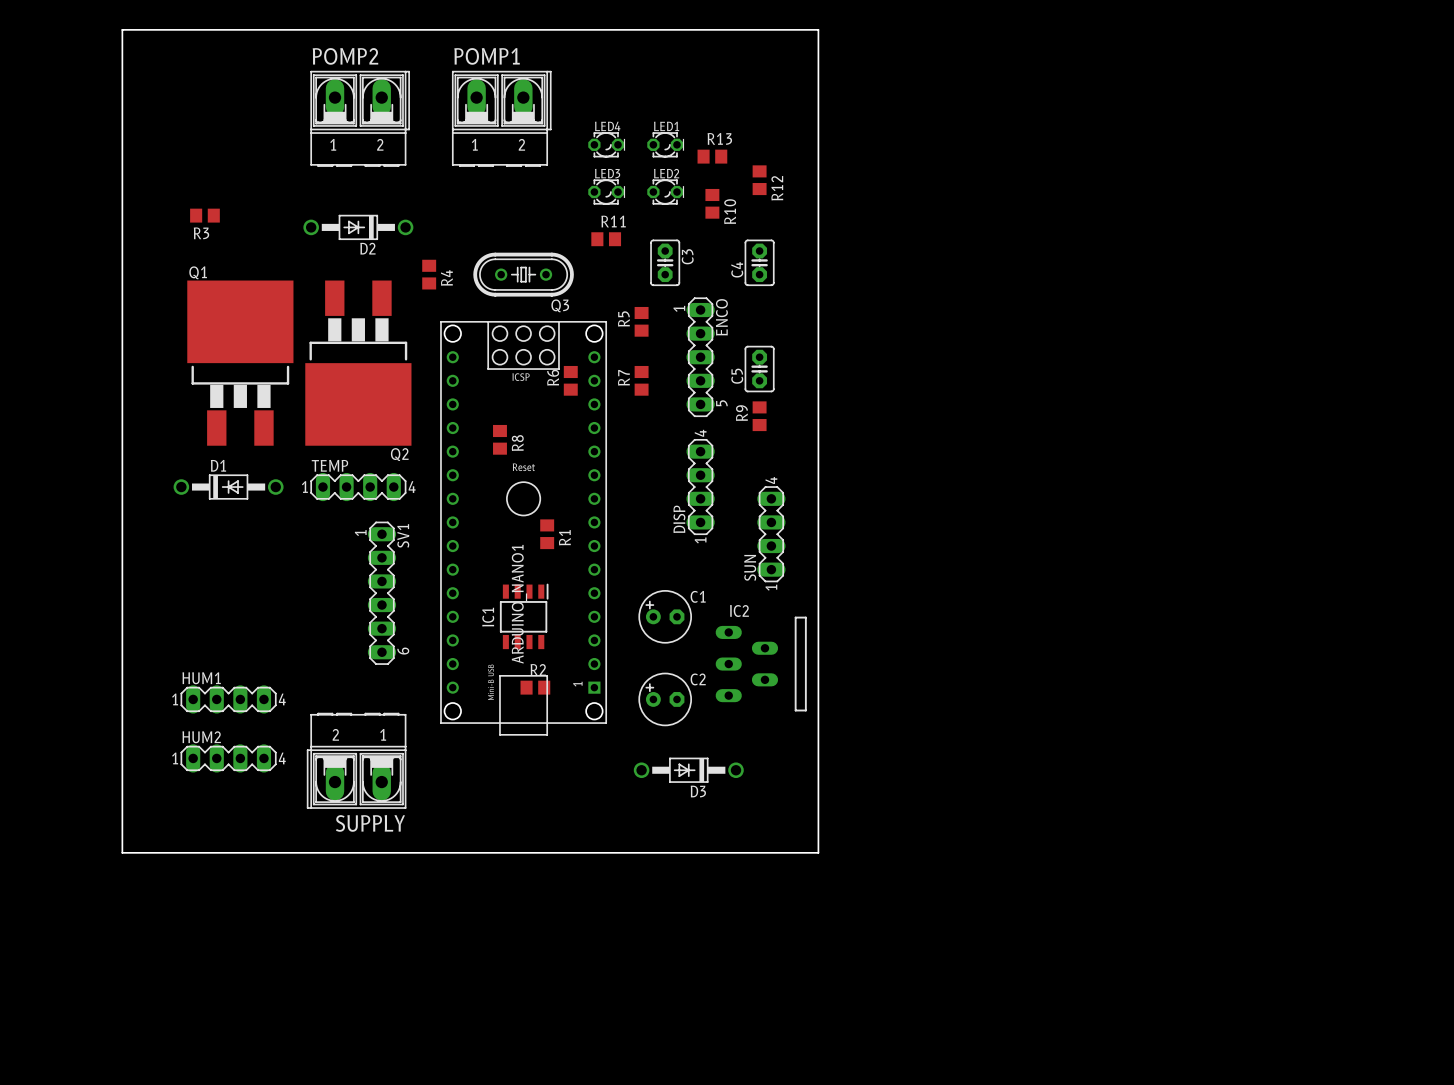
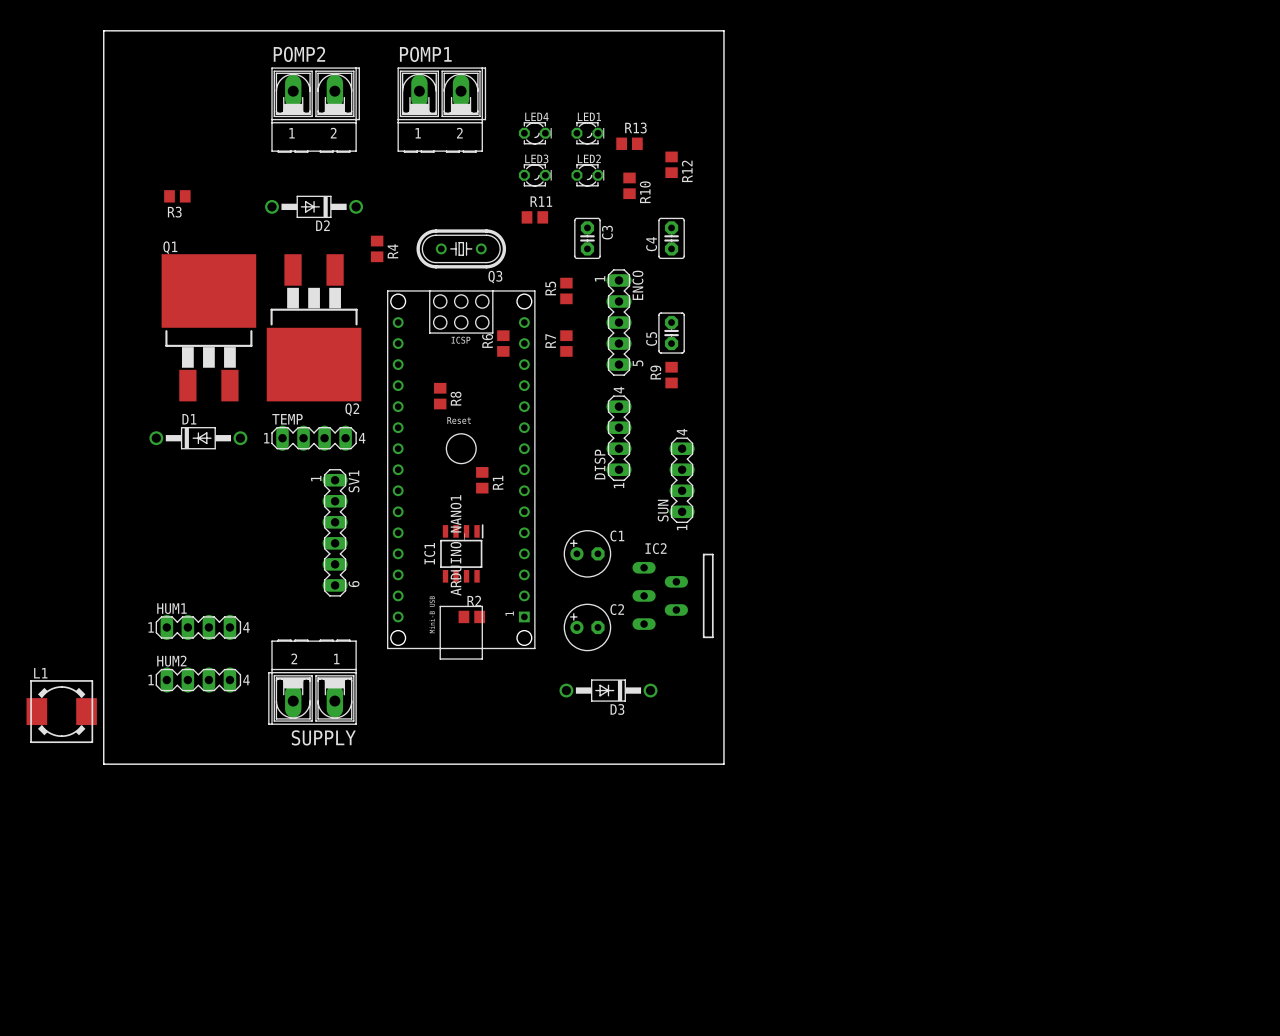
L1: none -> (61, 711)

